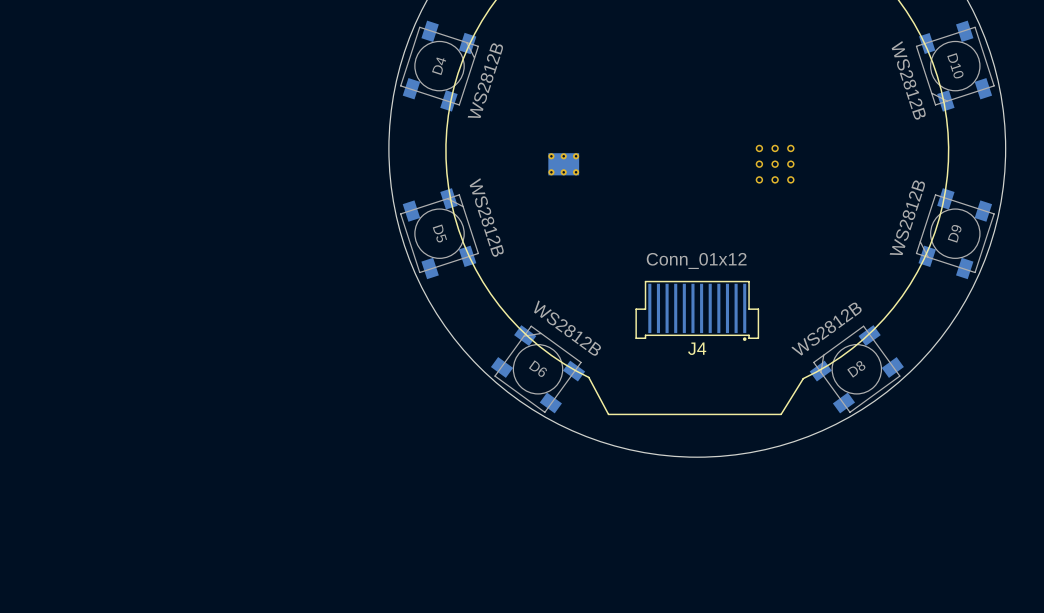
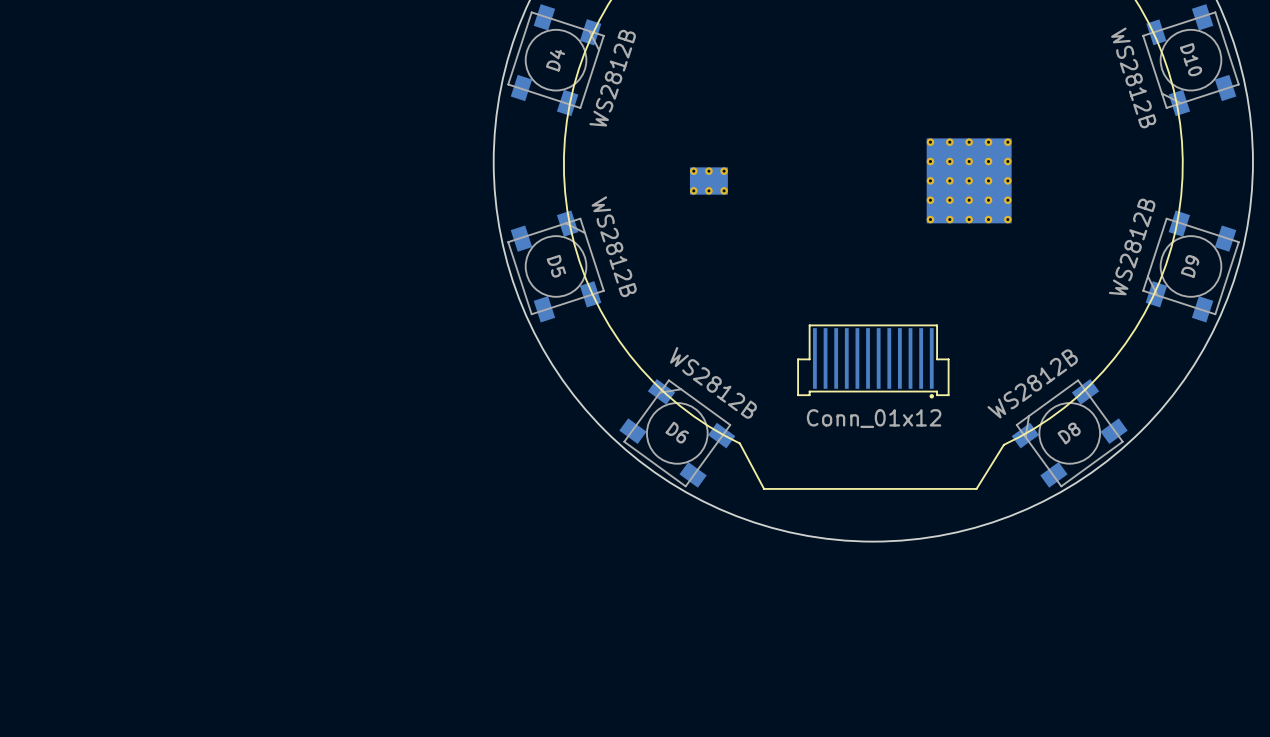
part footprint: [755, 144, 795, 184] -> [926, 138, 1012, 224]
J4 value position: Conn_01x12 (696, 260) -> Conn_01x12 (874, 418)
J4 name: J4 (697, 348) -> none

